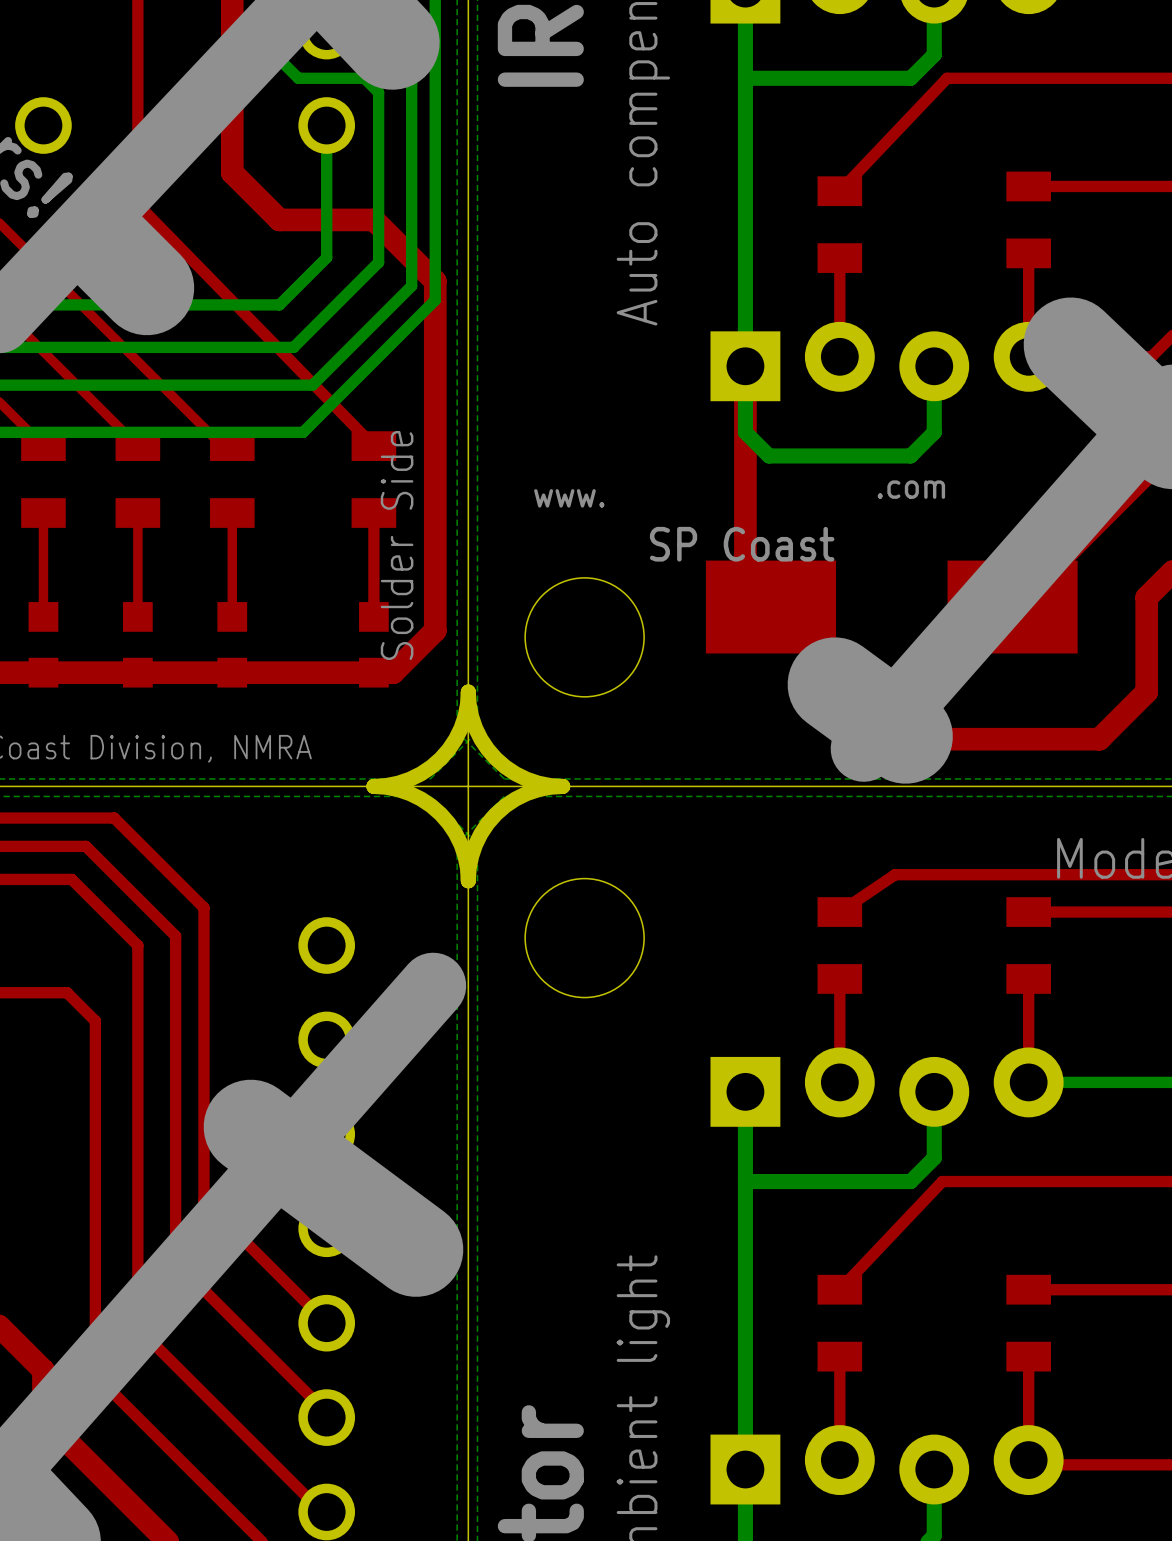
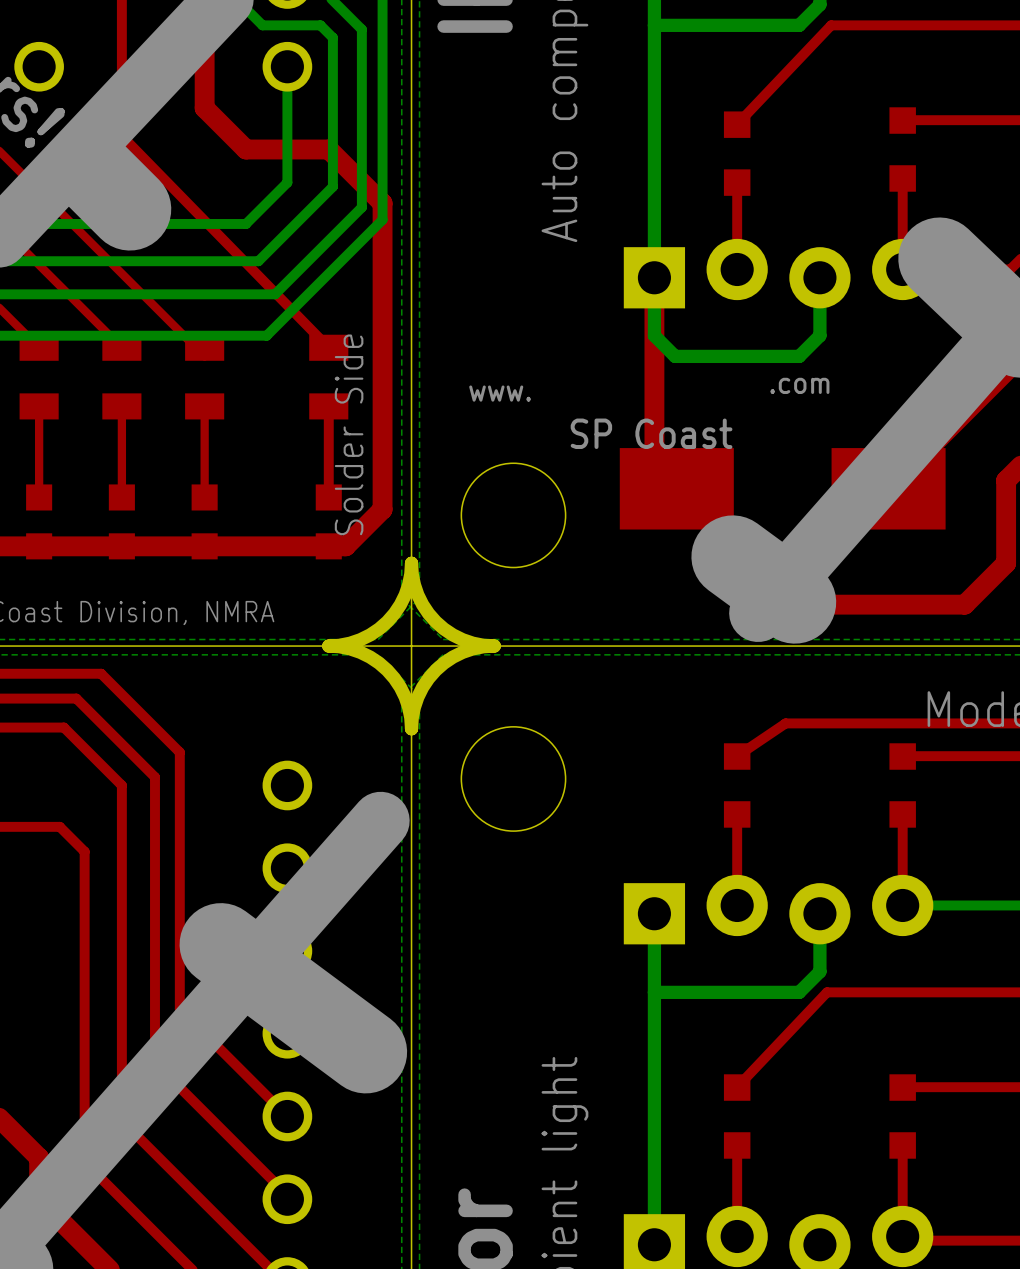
part footprint: [1006, 171, 1051, 269] -> [889, 107, 916, 192]
part footprint: [817, 176, 863, 273] -> [723, 111, 751, 196]
part footprint: [817, 897, 863, 994] -> [723, 743, 751, 828]
part footprint: [1006, 897, 1051, 994] -> [889, 743, 916, 828]
part footprint: [817, 1274, 863, 1372] -> [723, 1074, 751, 1159]
part footprint: [1006, 1274, 1051, 1372] -> [889, 1074, 916, 1159]

